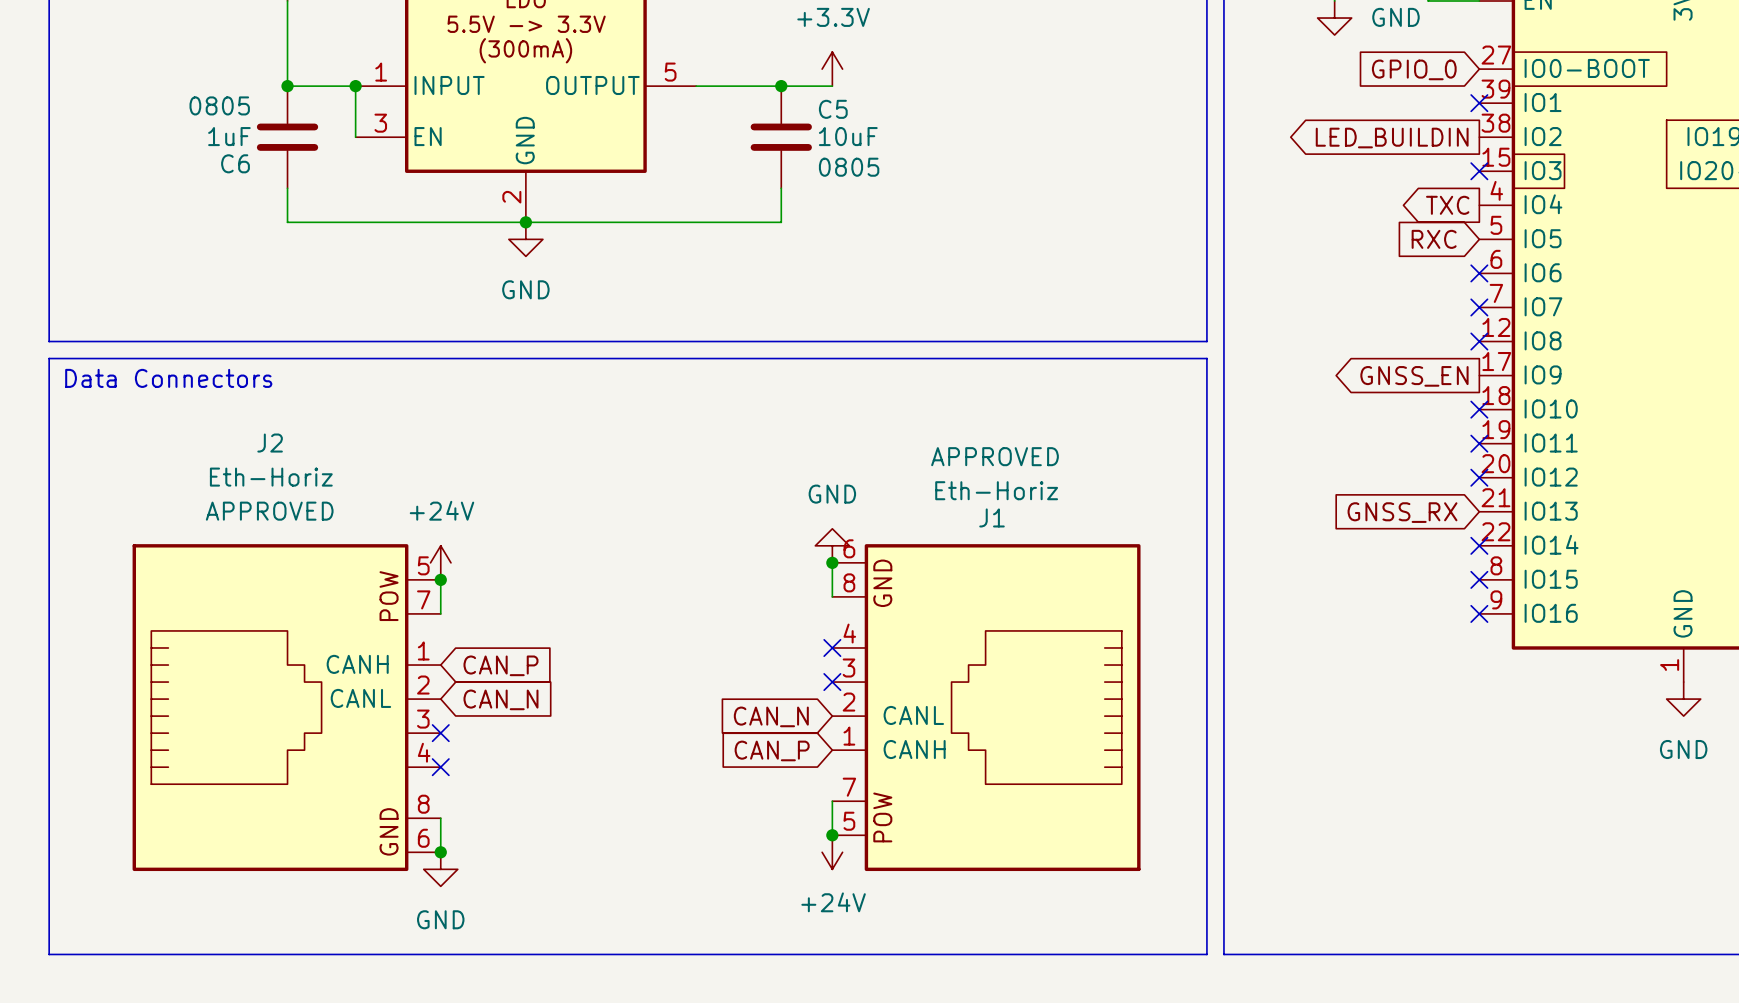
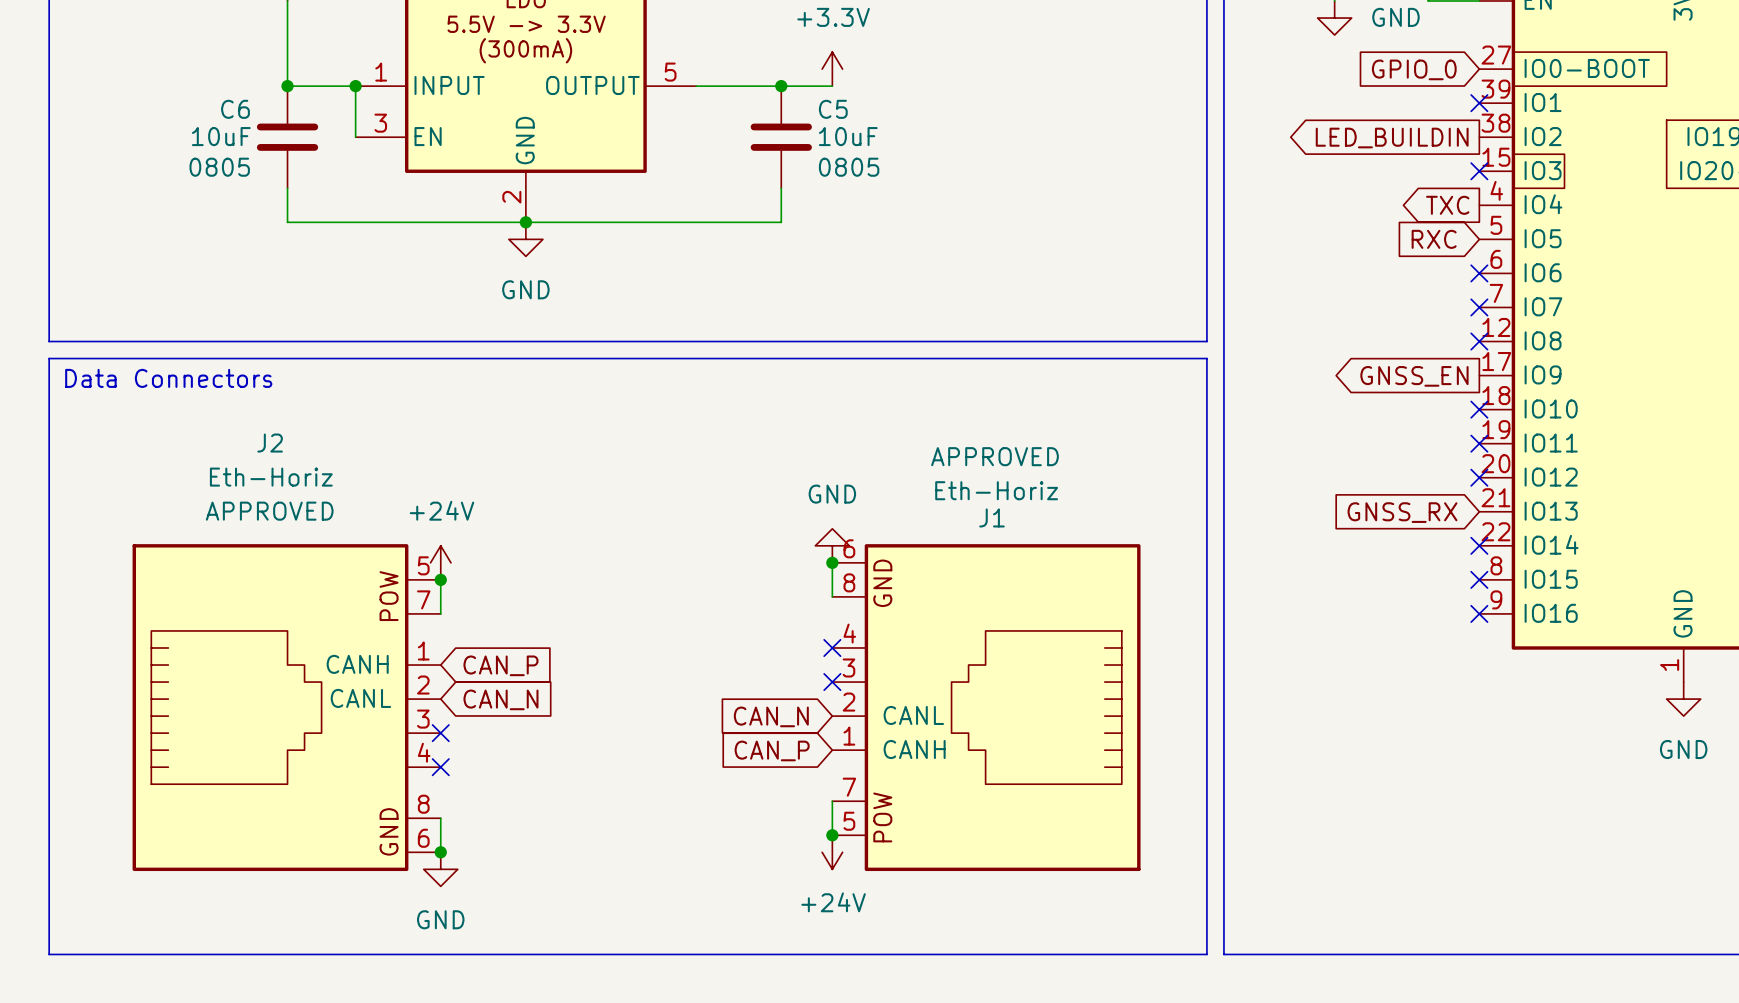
C6 text position: 0805 (219, 105) -> 0805 (219, 167)
C6 value: 1uF (229, 136) -> 10uF (221, 136)
C6 name position: C6 (235, 163) -> C6 (235, 109)

